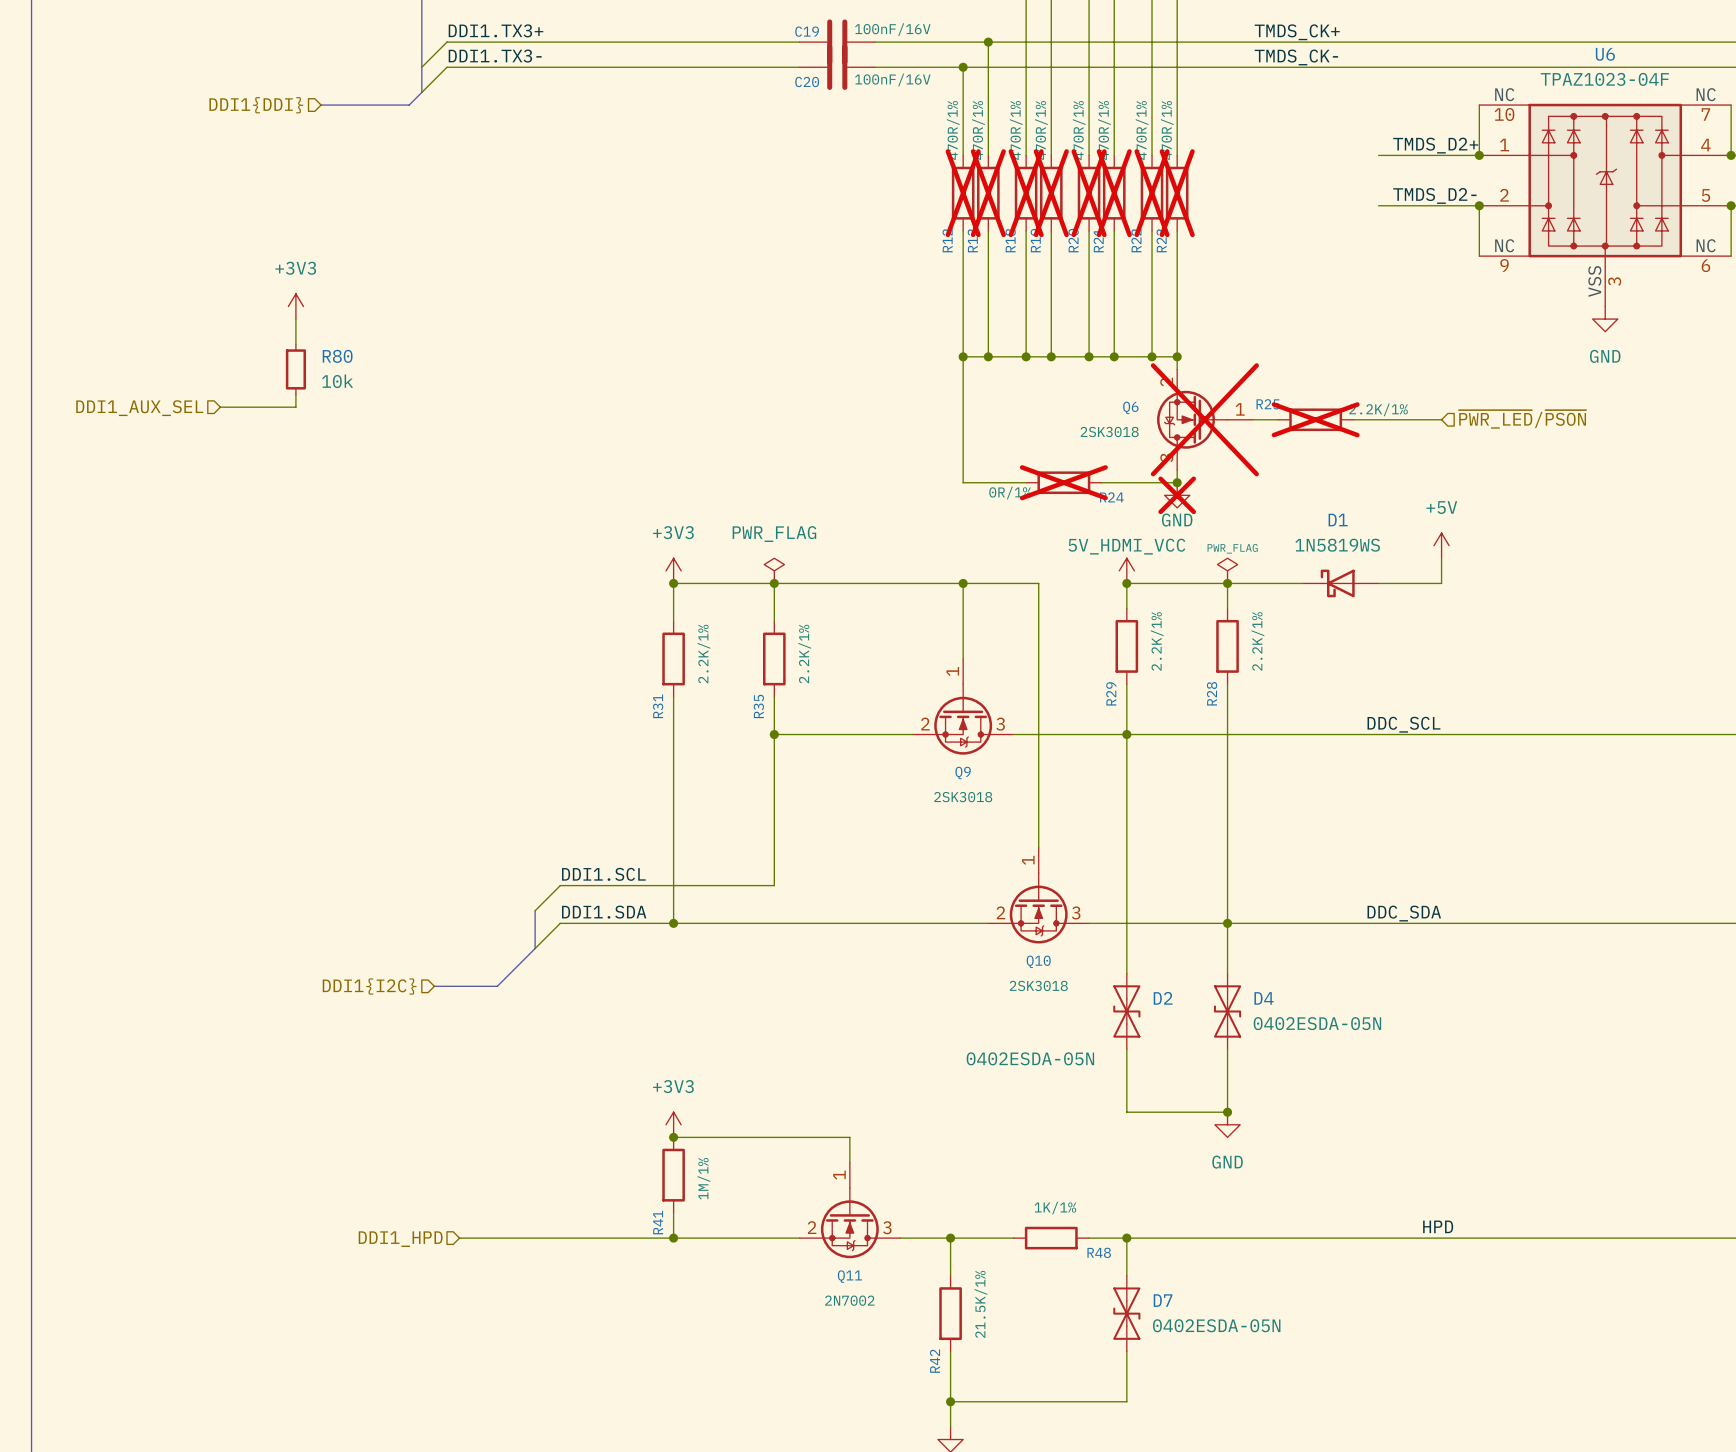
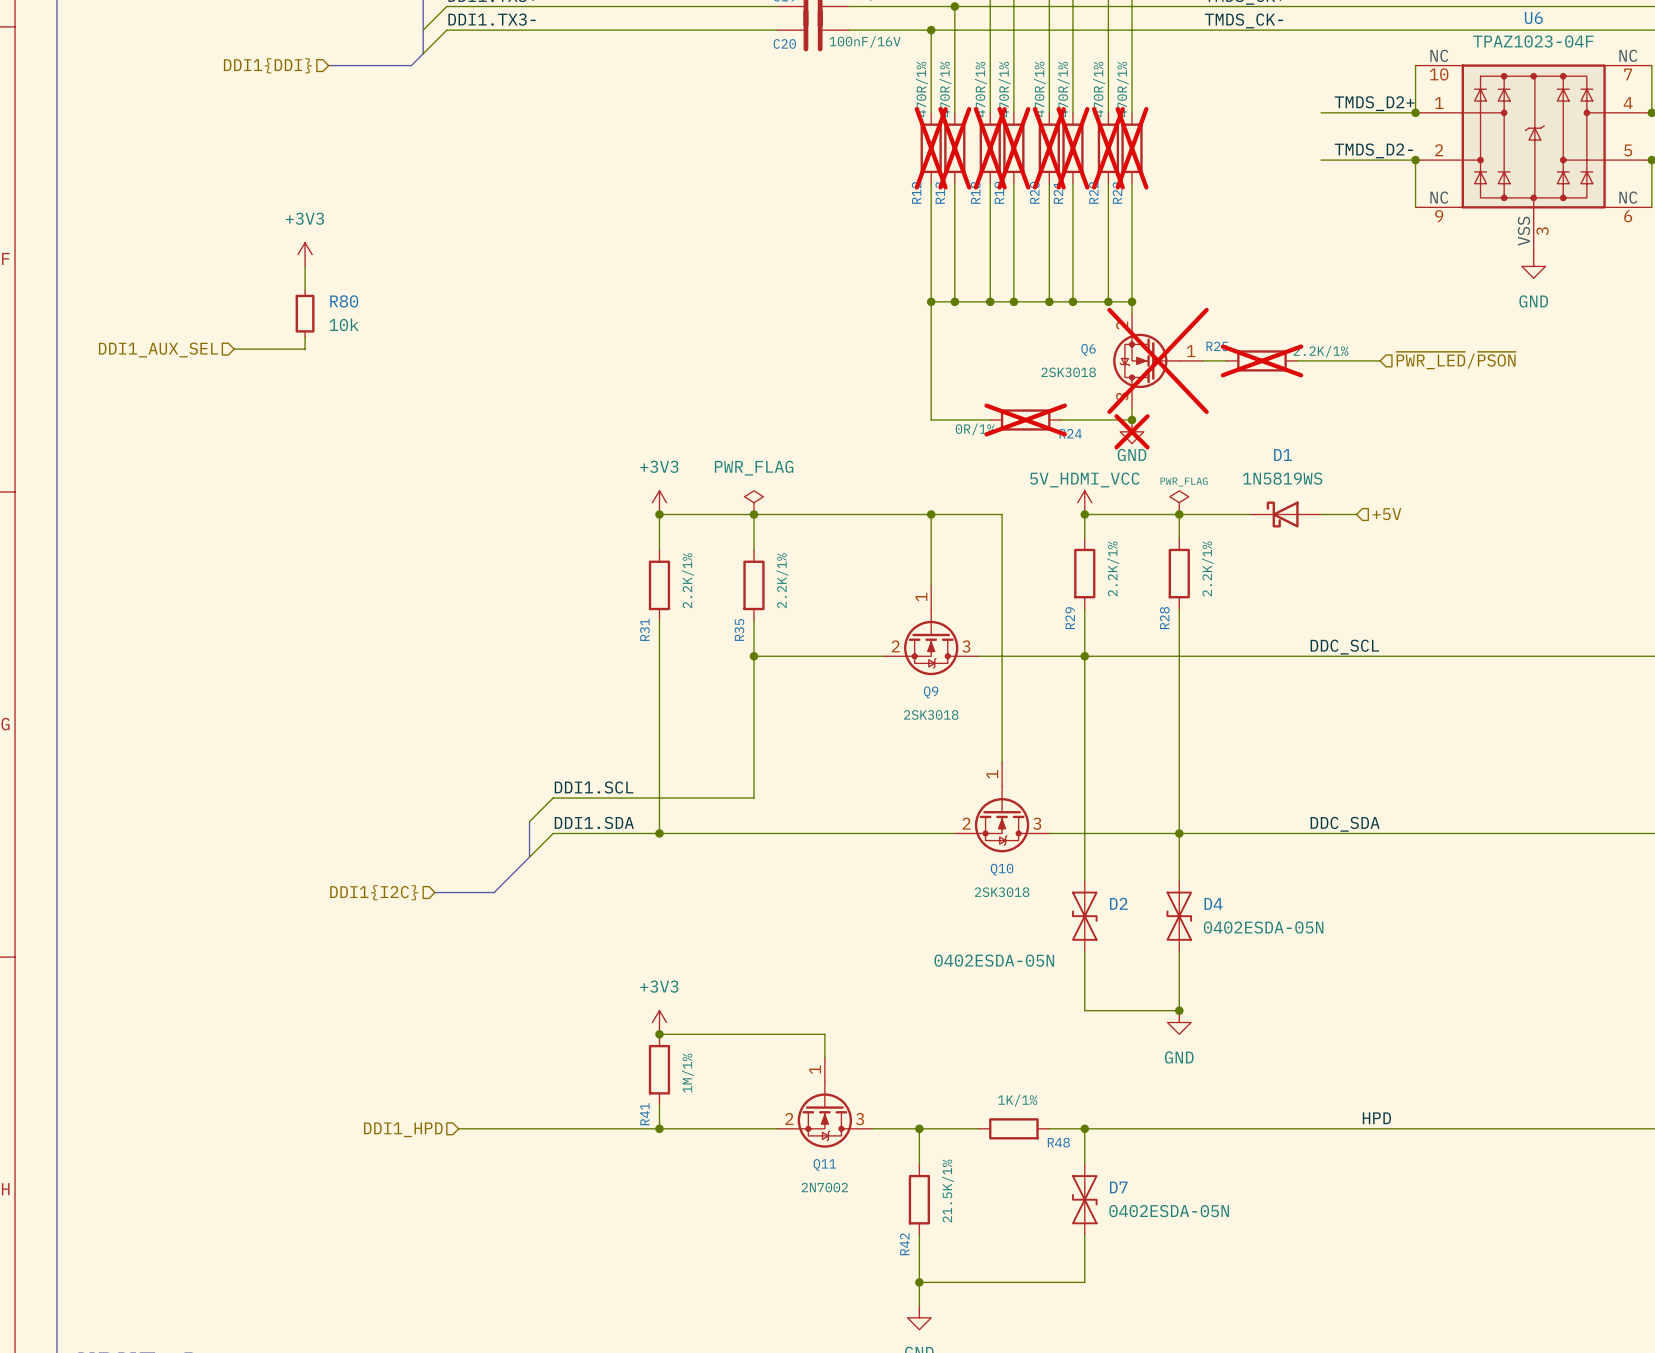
power symbol: +5V (1441, 545) -> none
wire: (1441, 558) (1441, 583) (1416, 583) -> none
hierarchical label: none -> +5V (1386, 514)

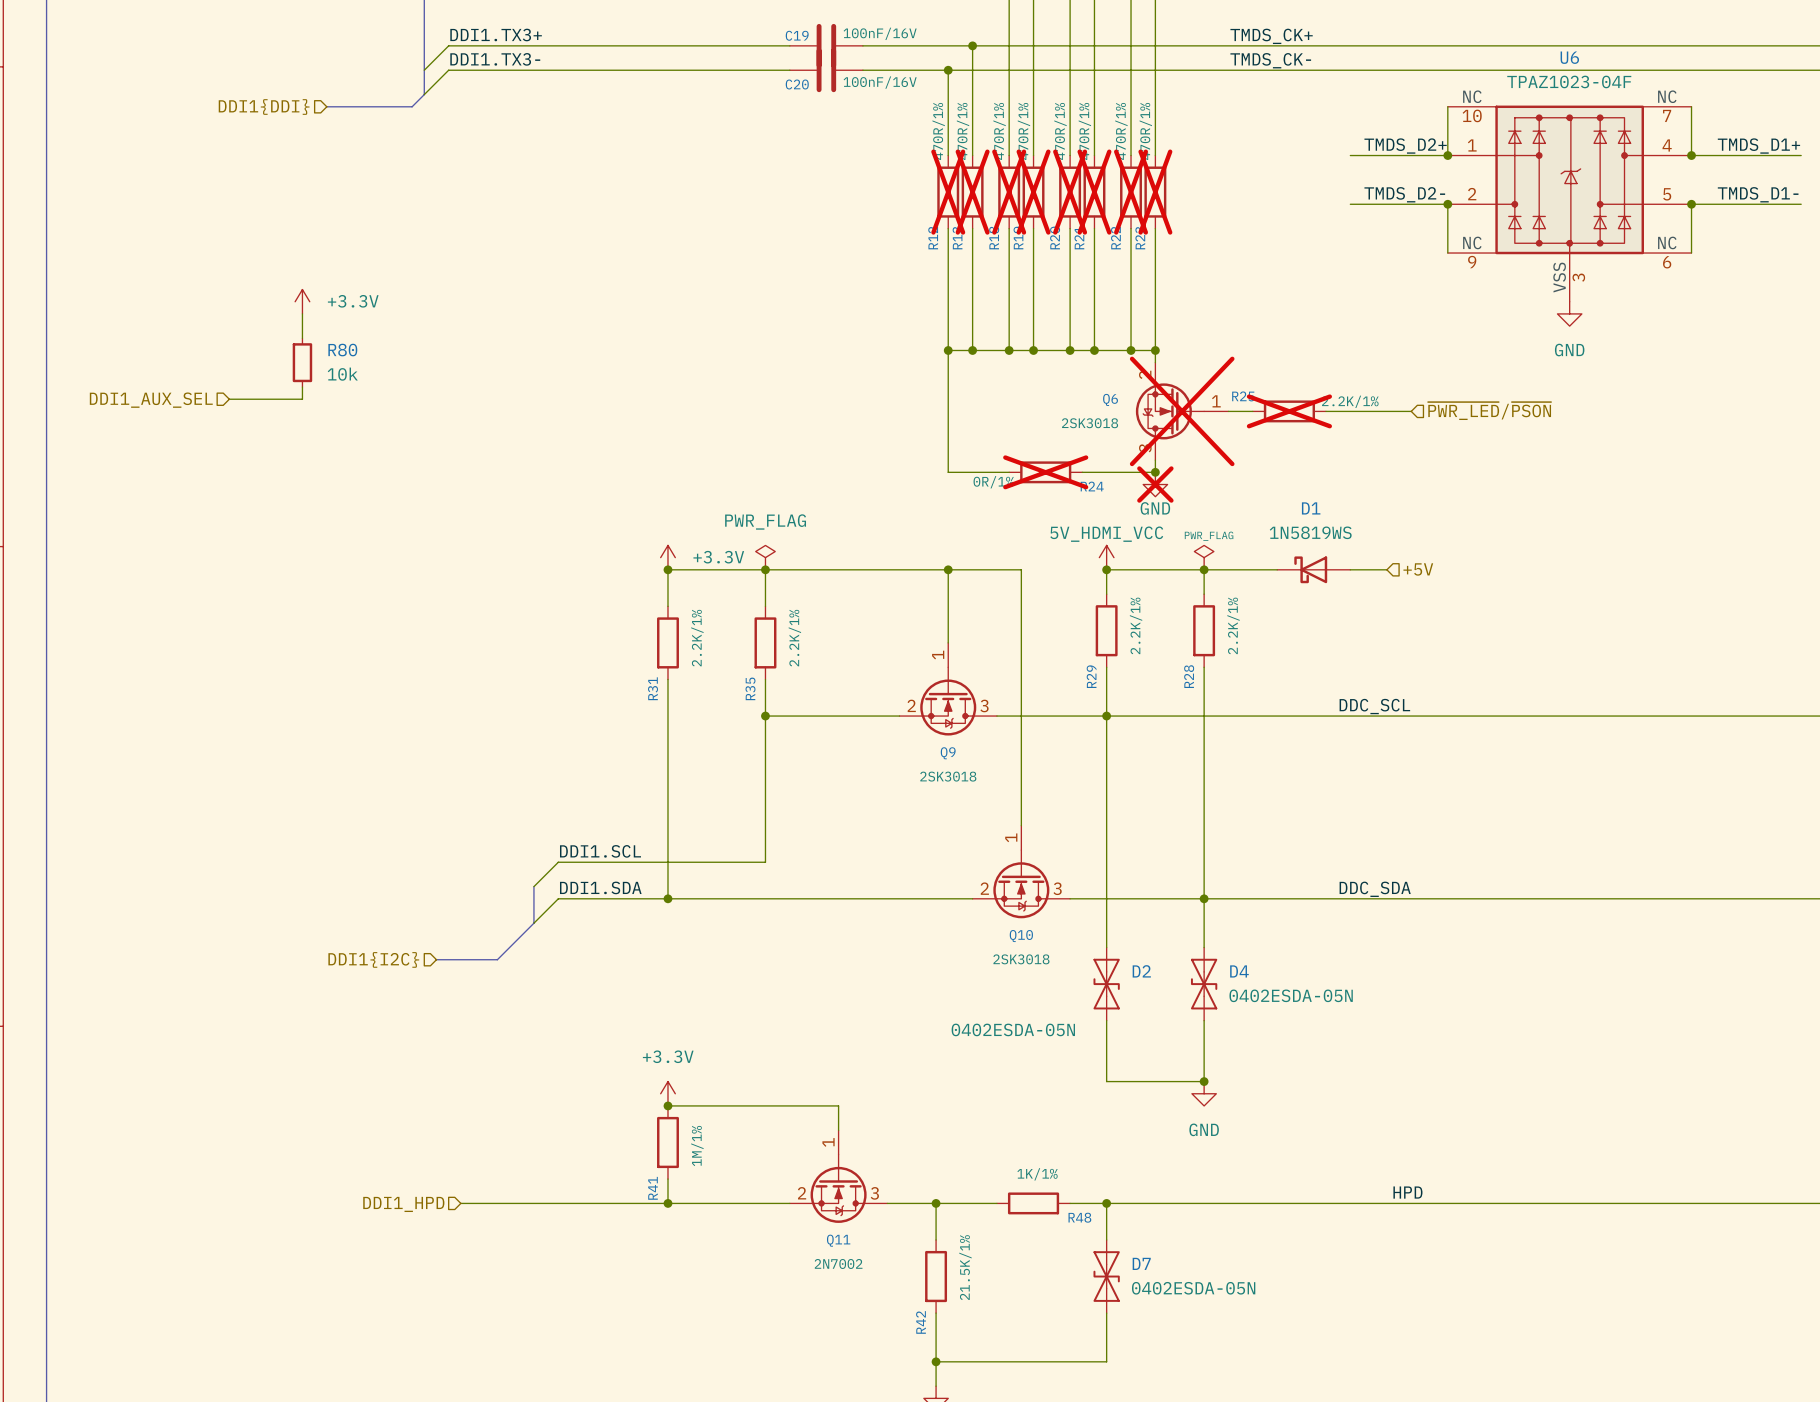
power symbol: +3V3 (305, 254) -> +3.3V (302, 301)
power symbol: +3V3 (659, 502) -> +3.3V (667, 557)
power symbol: +3V3 (659, 1022) -> +3.3V (667, 1093)

